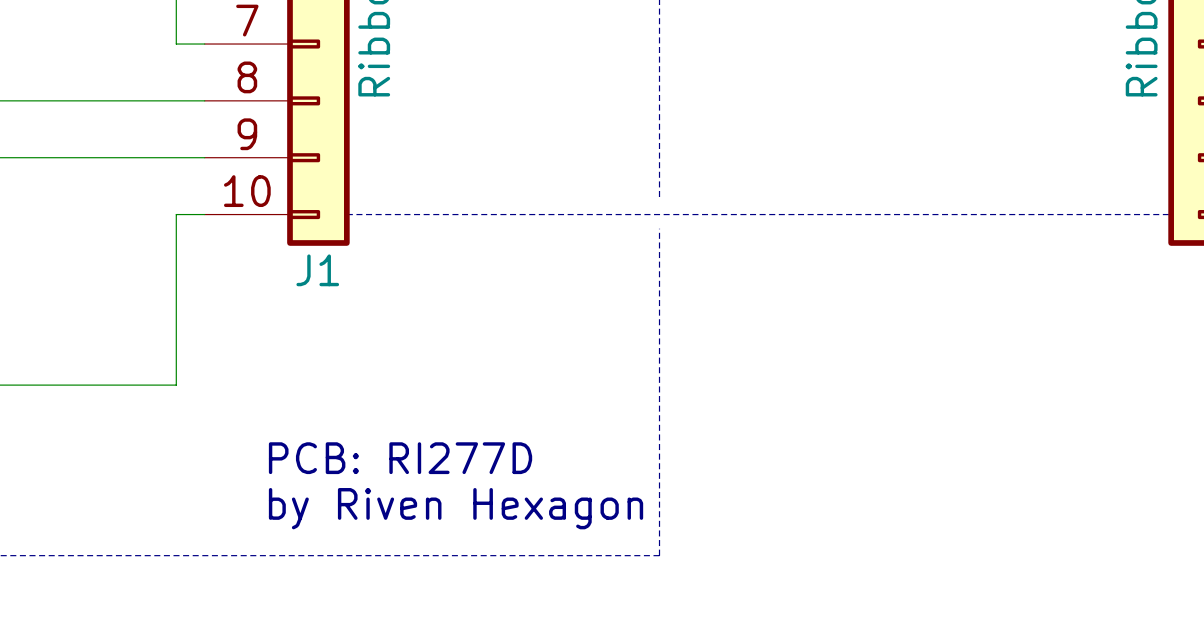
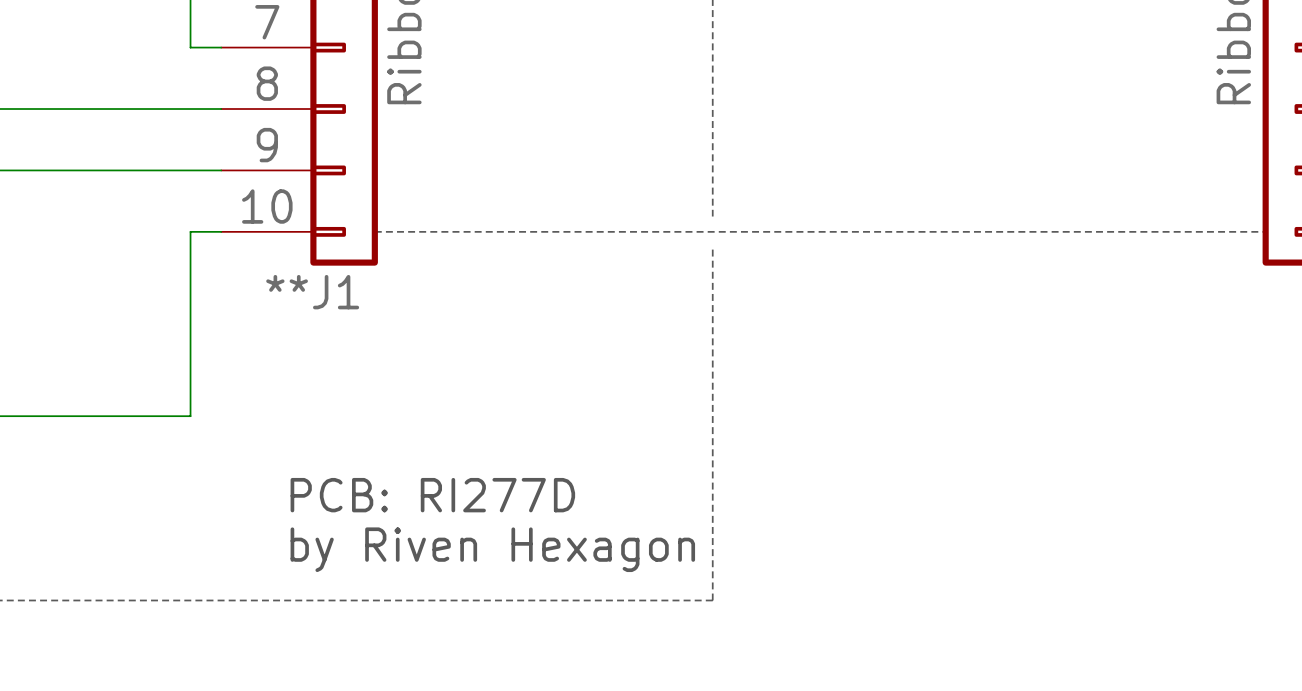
J1 name: J1 (317, 270) -> **J1 (312, 292)

